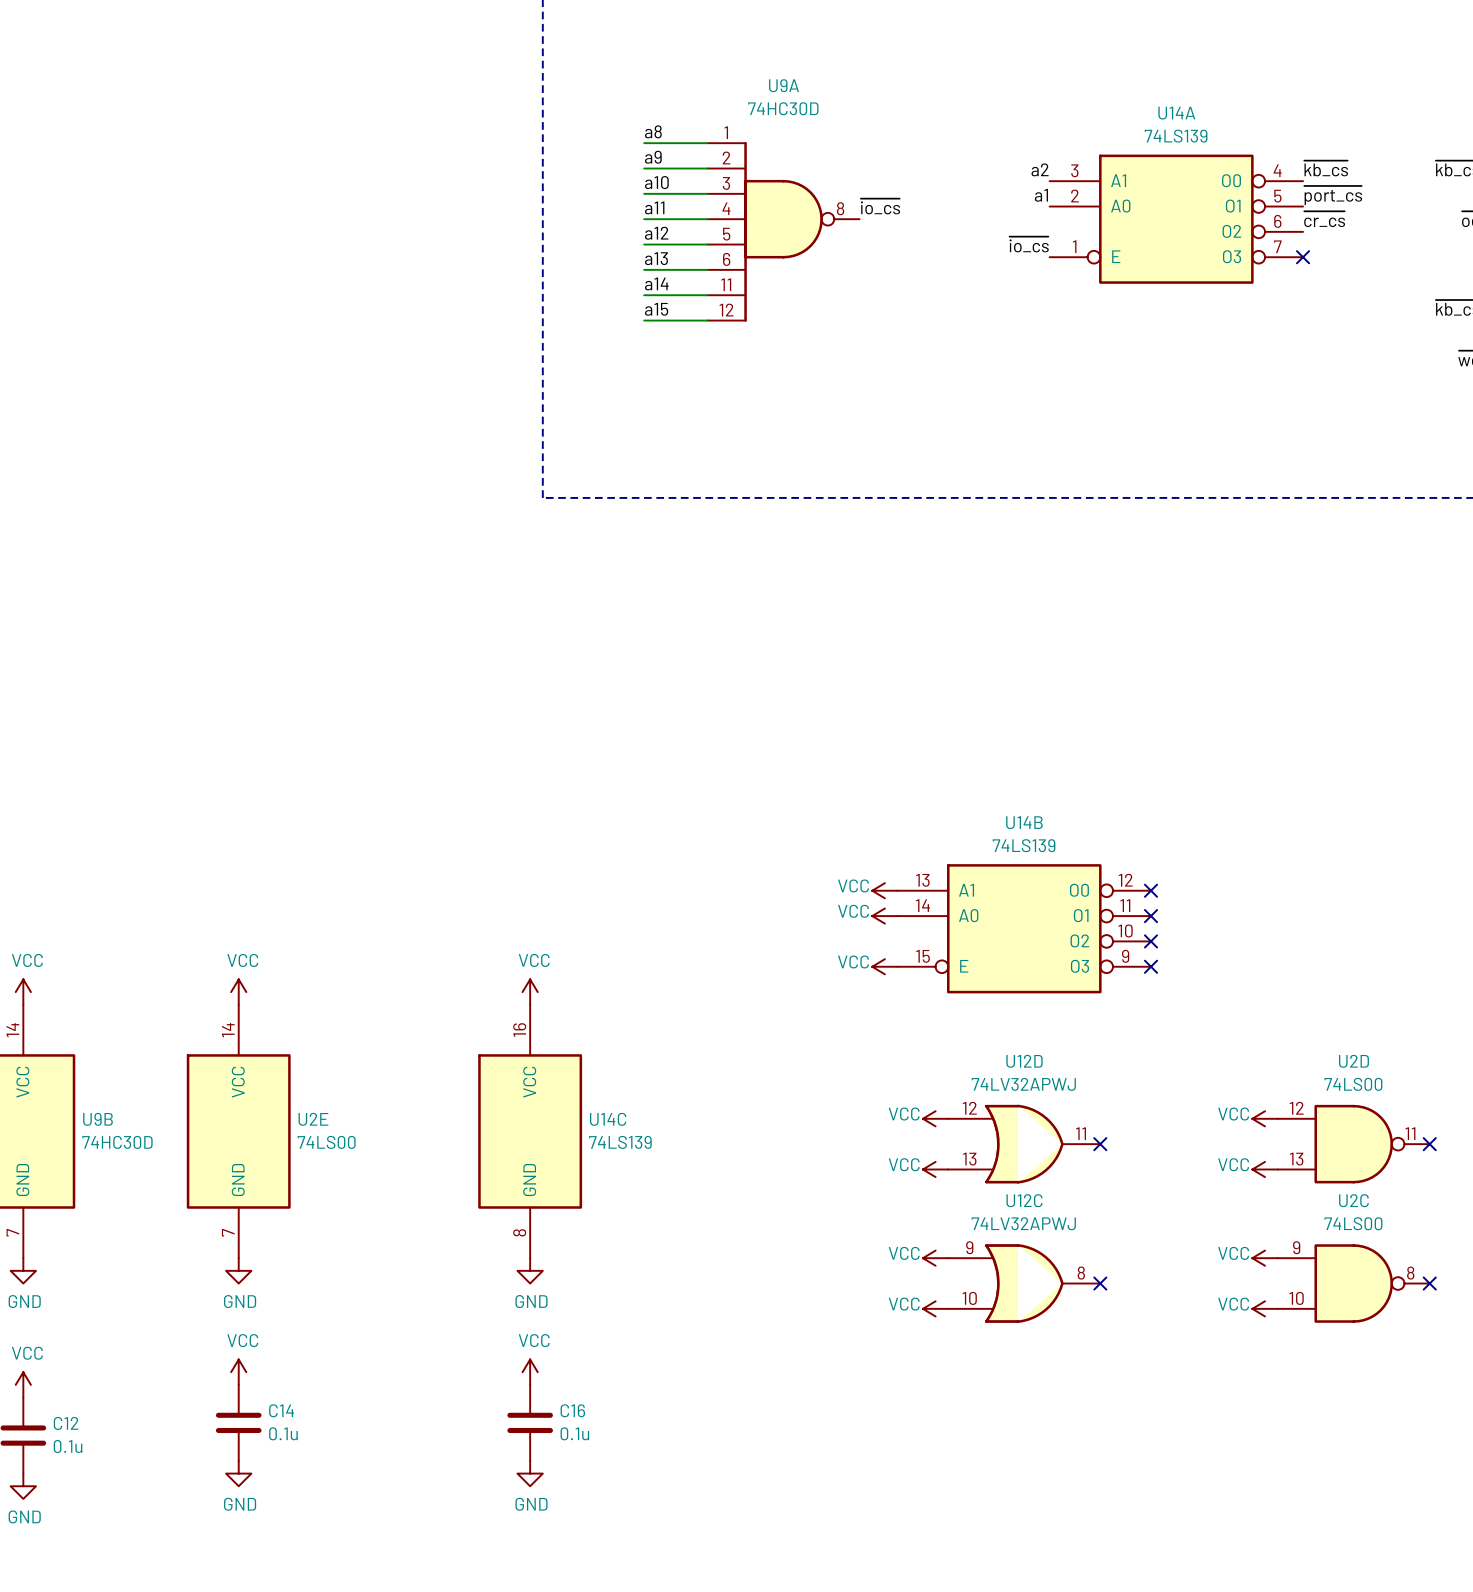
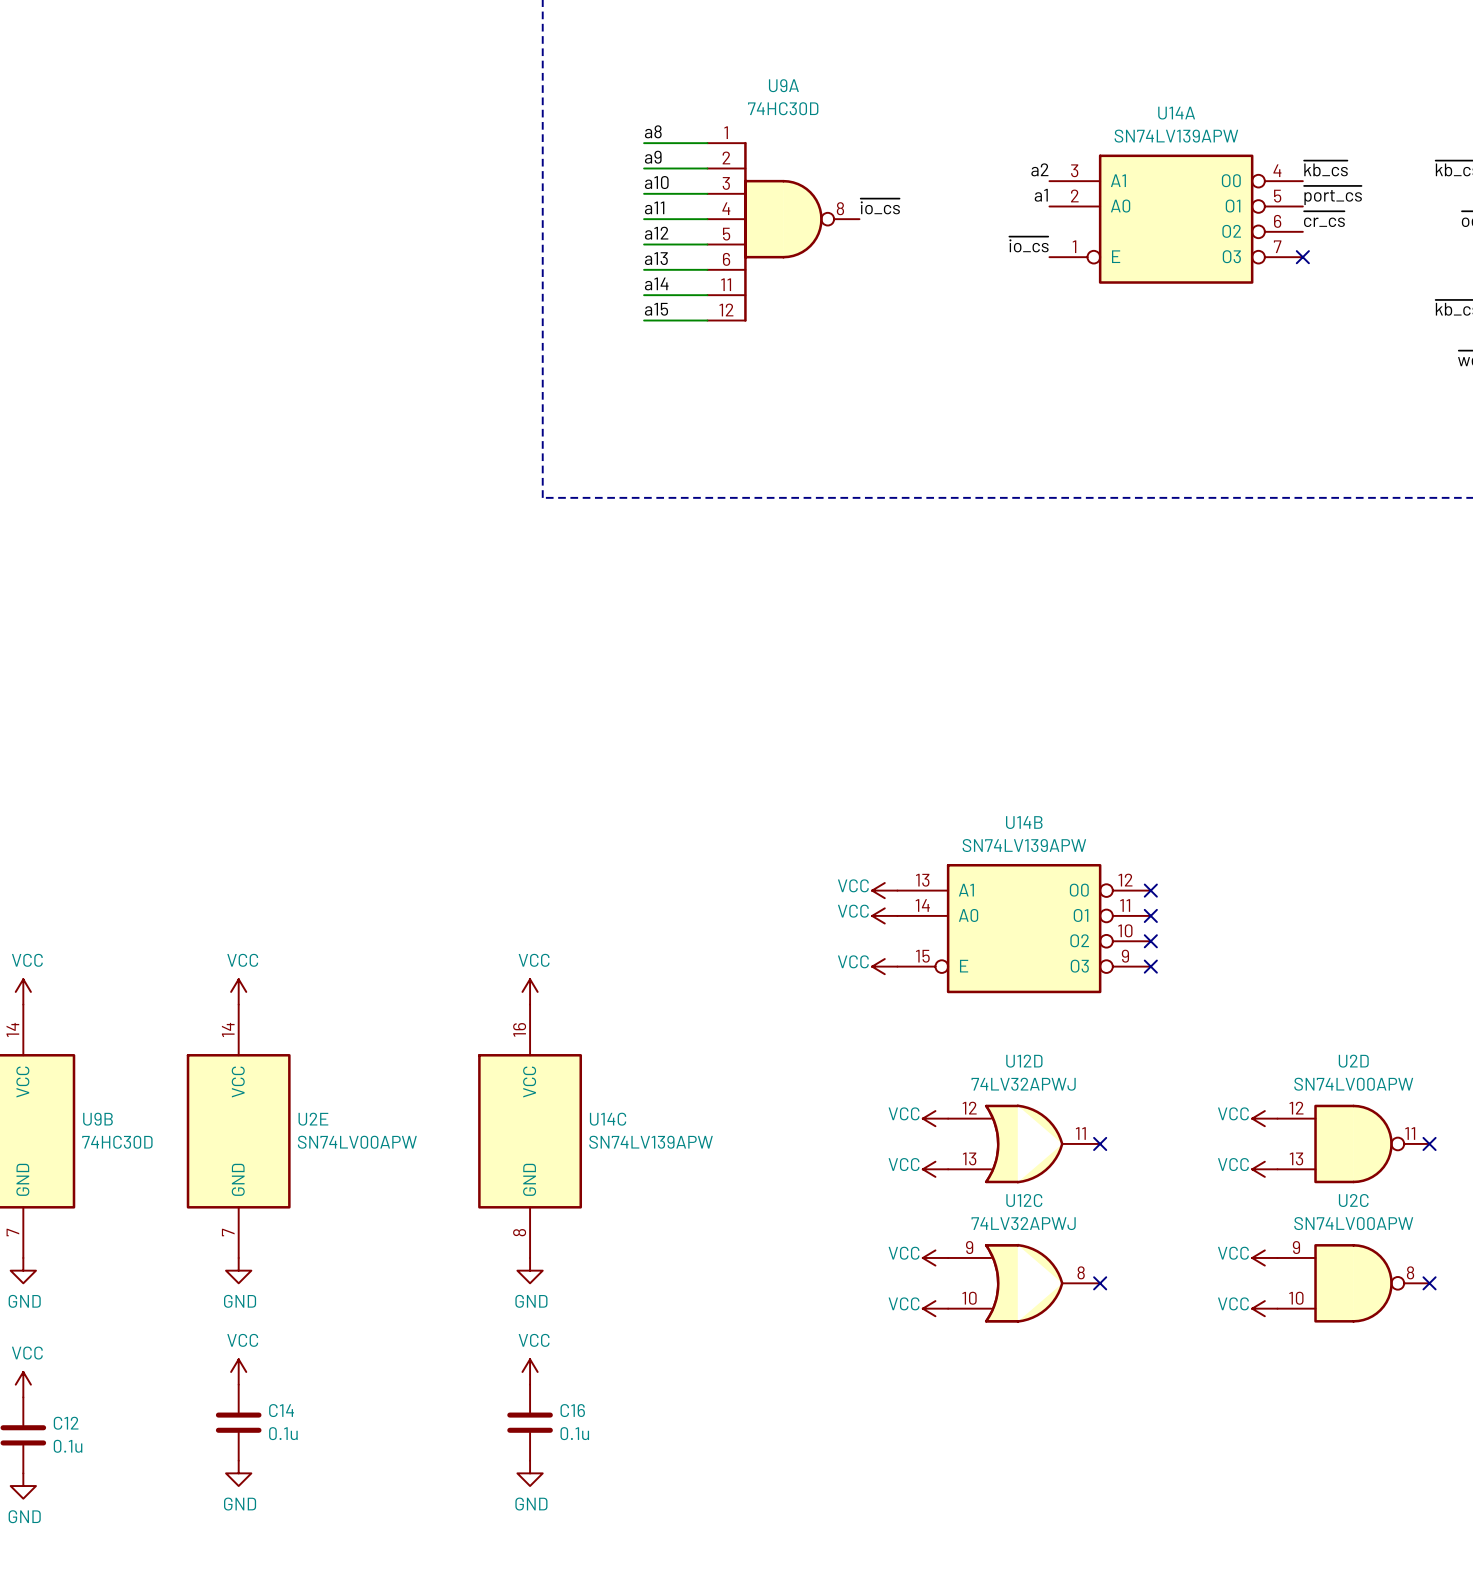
U14A value: 74LS139 (1176, 136) -> SN74LV139APW (1176, 136)
U14B value: 74LS139 (1024, 845) -> SN74LV139APW (1024, 845)
U2D value: 74LS00 (1353, 1084) -> SN74LV00APW (1353, 1084)
U2E value: 74LS00 (326, 1142) -> SN74LV00APW (357, 1142)
U14C value: 74LS139 (620, 1142) -> SN74LV139APW (651, 1142)
U2C value: 74LS00 (1353, 1223) -> SN74LV00APW (1353, 1223)

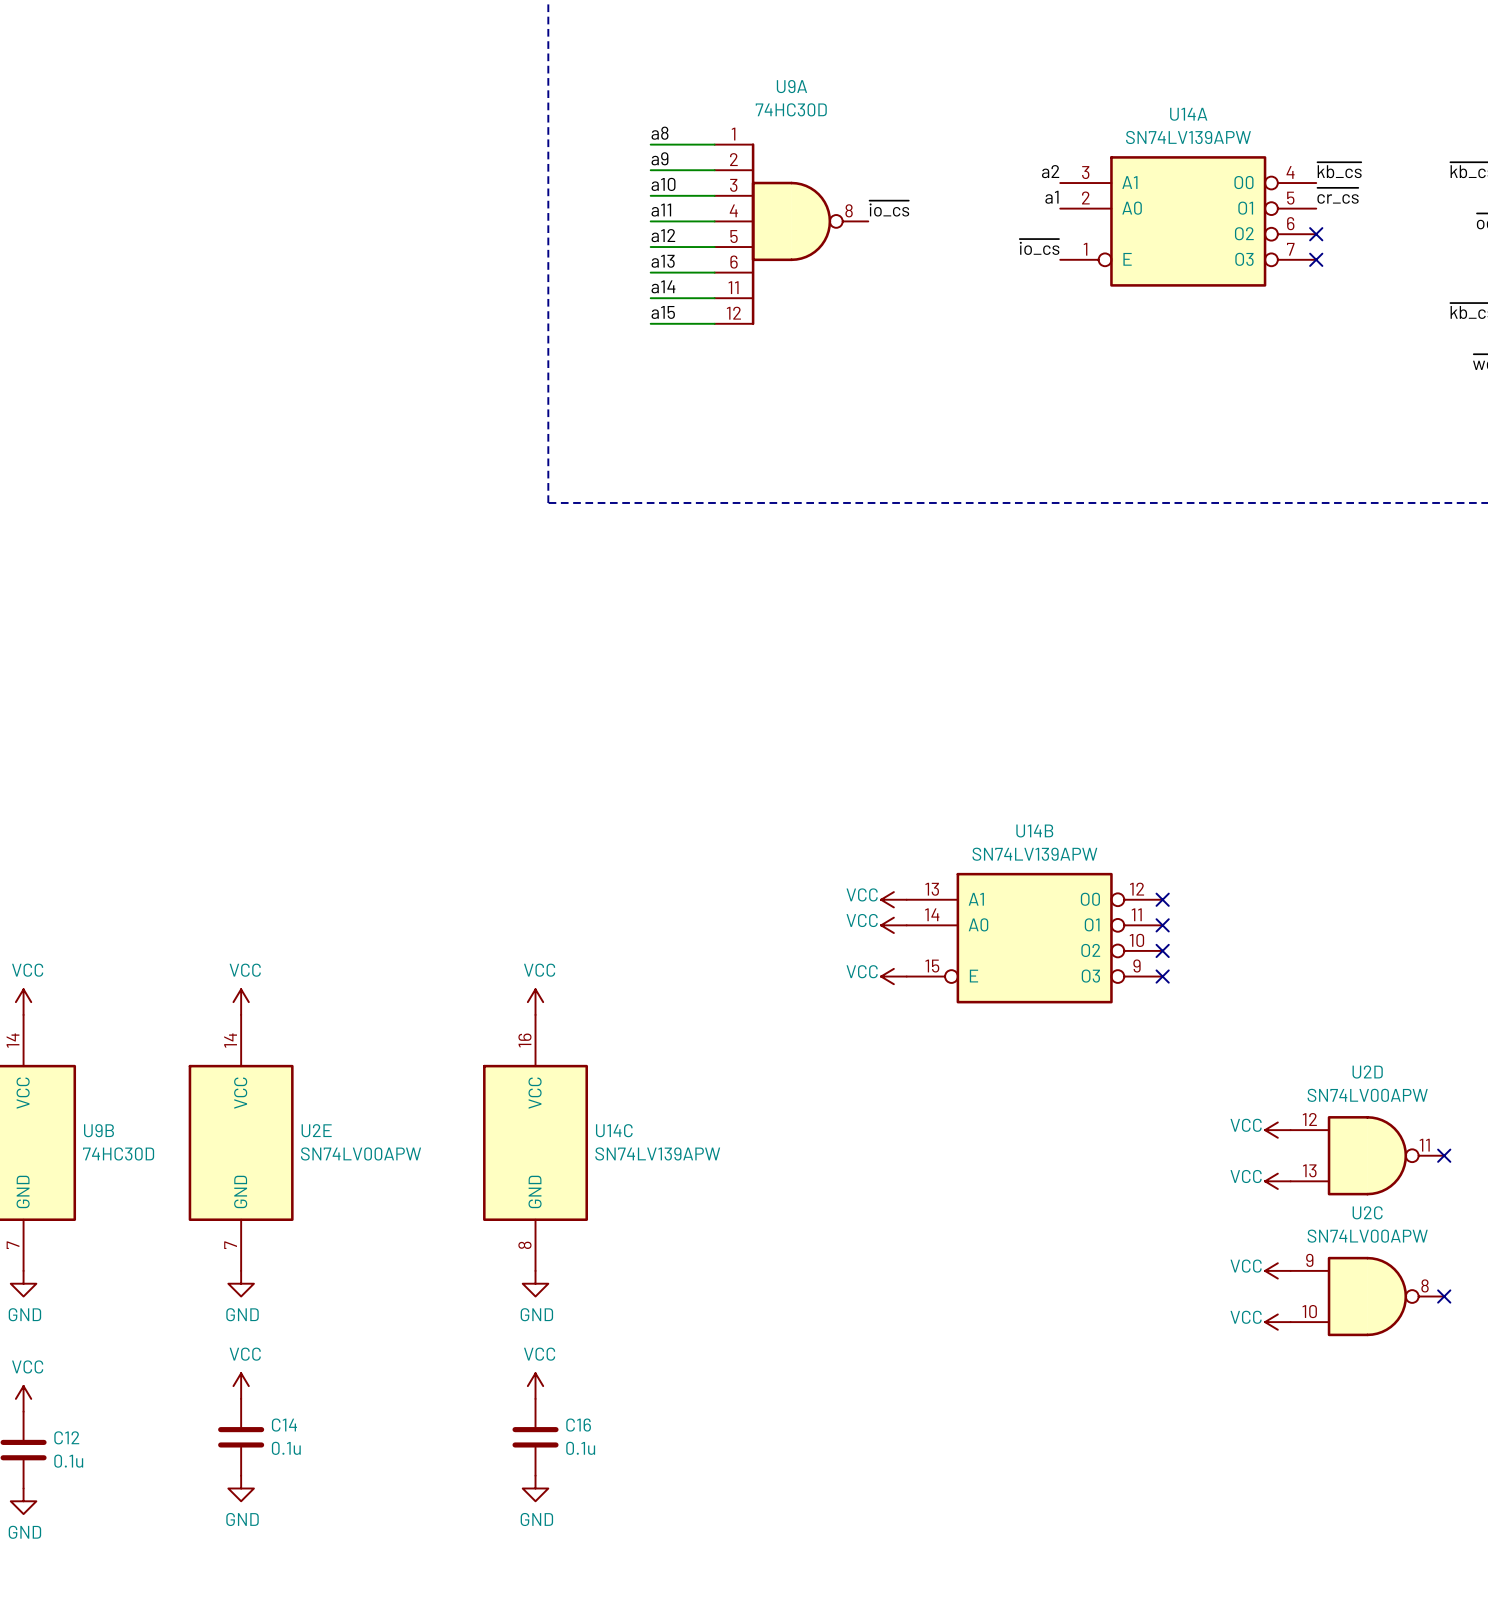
label: ~{port_cs} (1332, 195) -> ~{cr_cs} (1338, 195)
label: ~{cr_cs} (1324, 219) -> none
no-connect mark: none -> (1316, 234)
power symbol: VCC (935, 1118) -> none
U12D: 74LV32APWJ (1024, 1143) -> none
no-connect mark: (1100, 1143) -> none
power symbol: VCC (935, 1169) -> none
power symbol: VCC (935, 1257) -> none
U12C: 74LV32APWJ (1024, 1283) -> none
no-connect mark: (1100, 1283) -> none
power symbol: VCC (935, 1308) -> none

